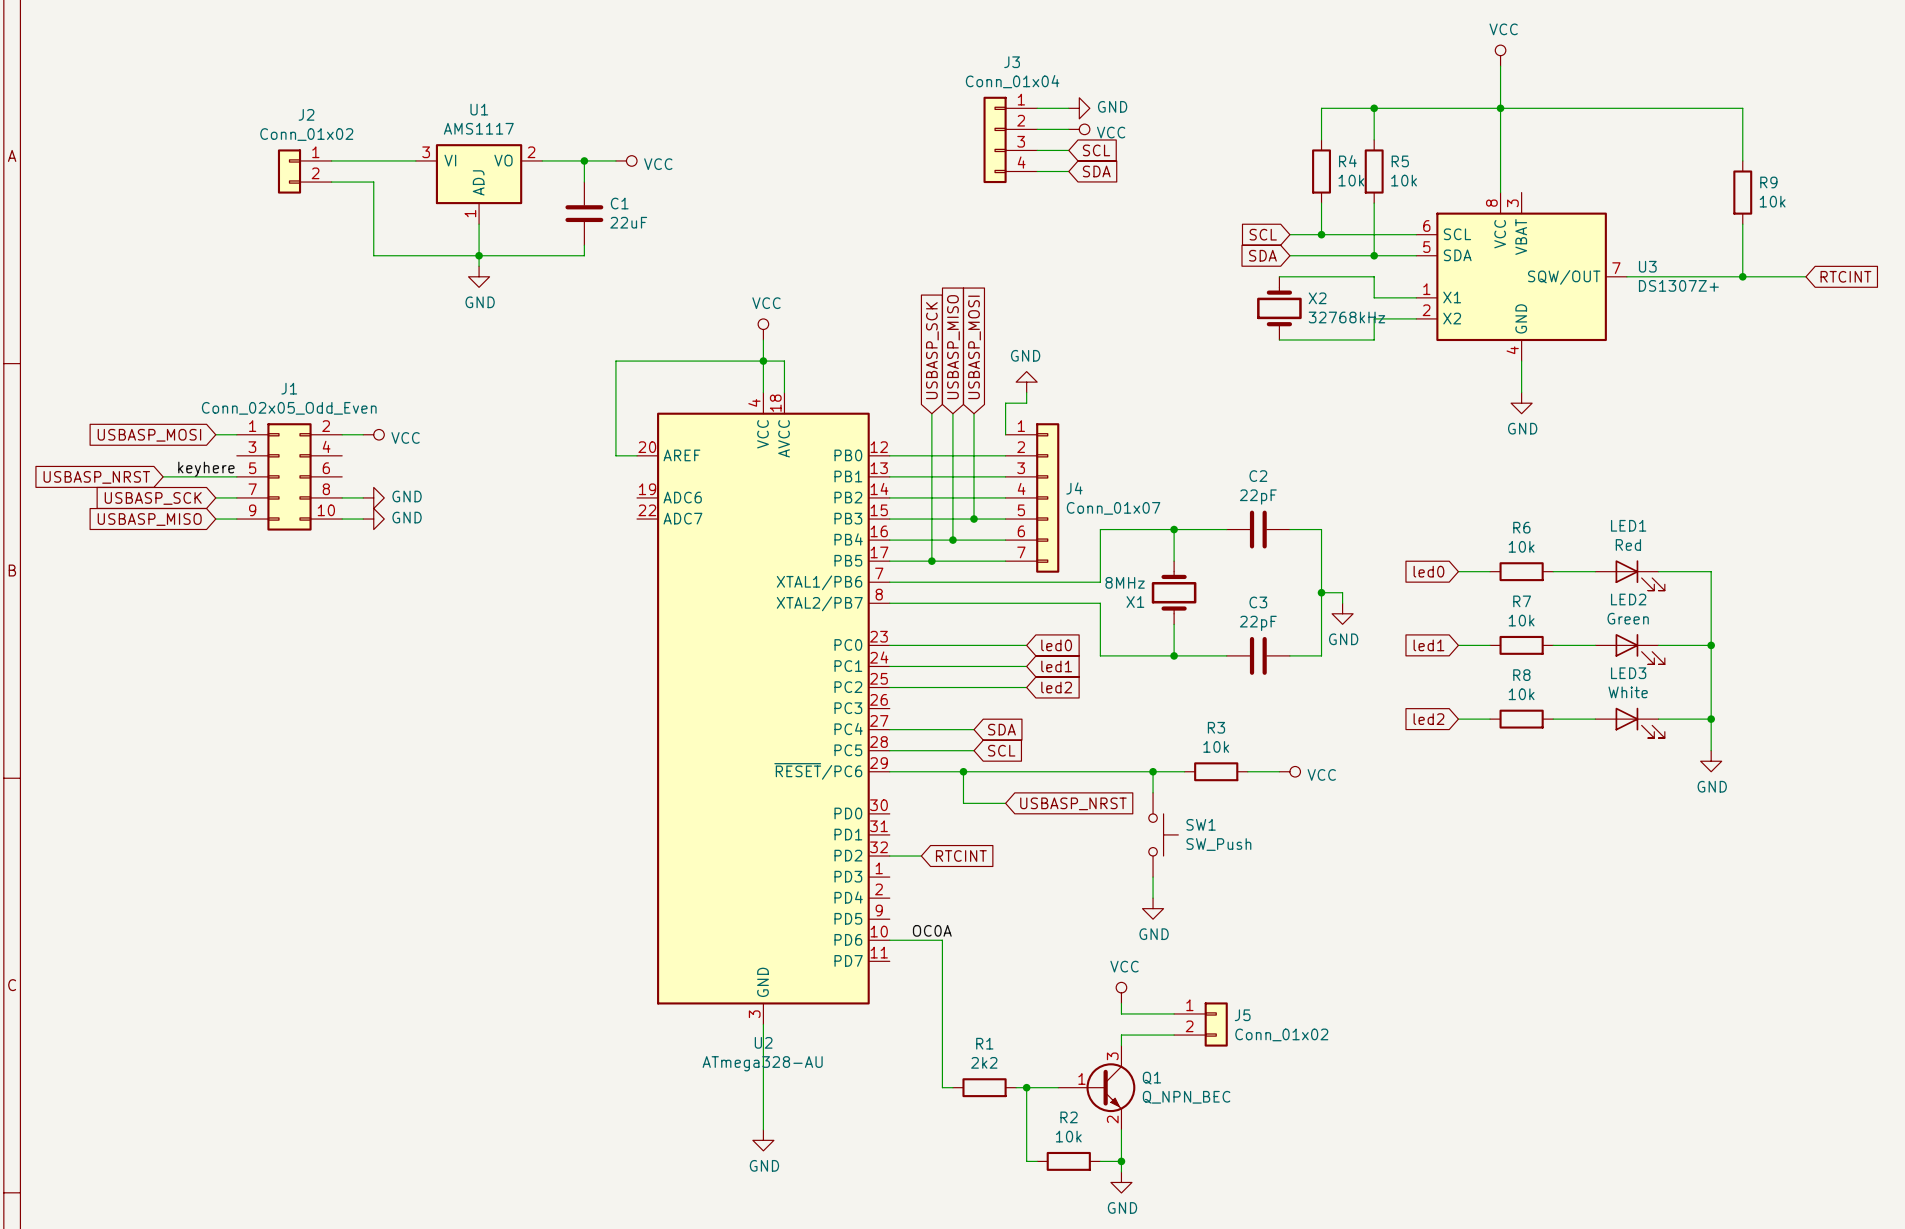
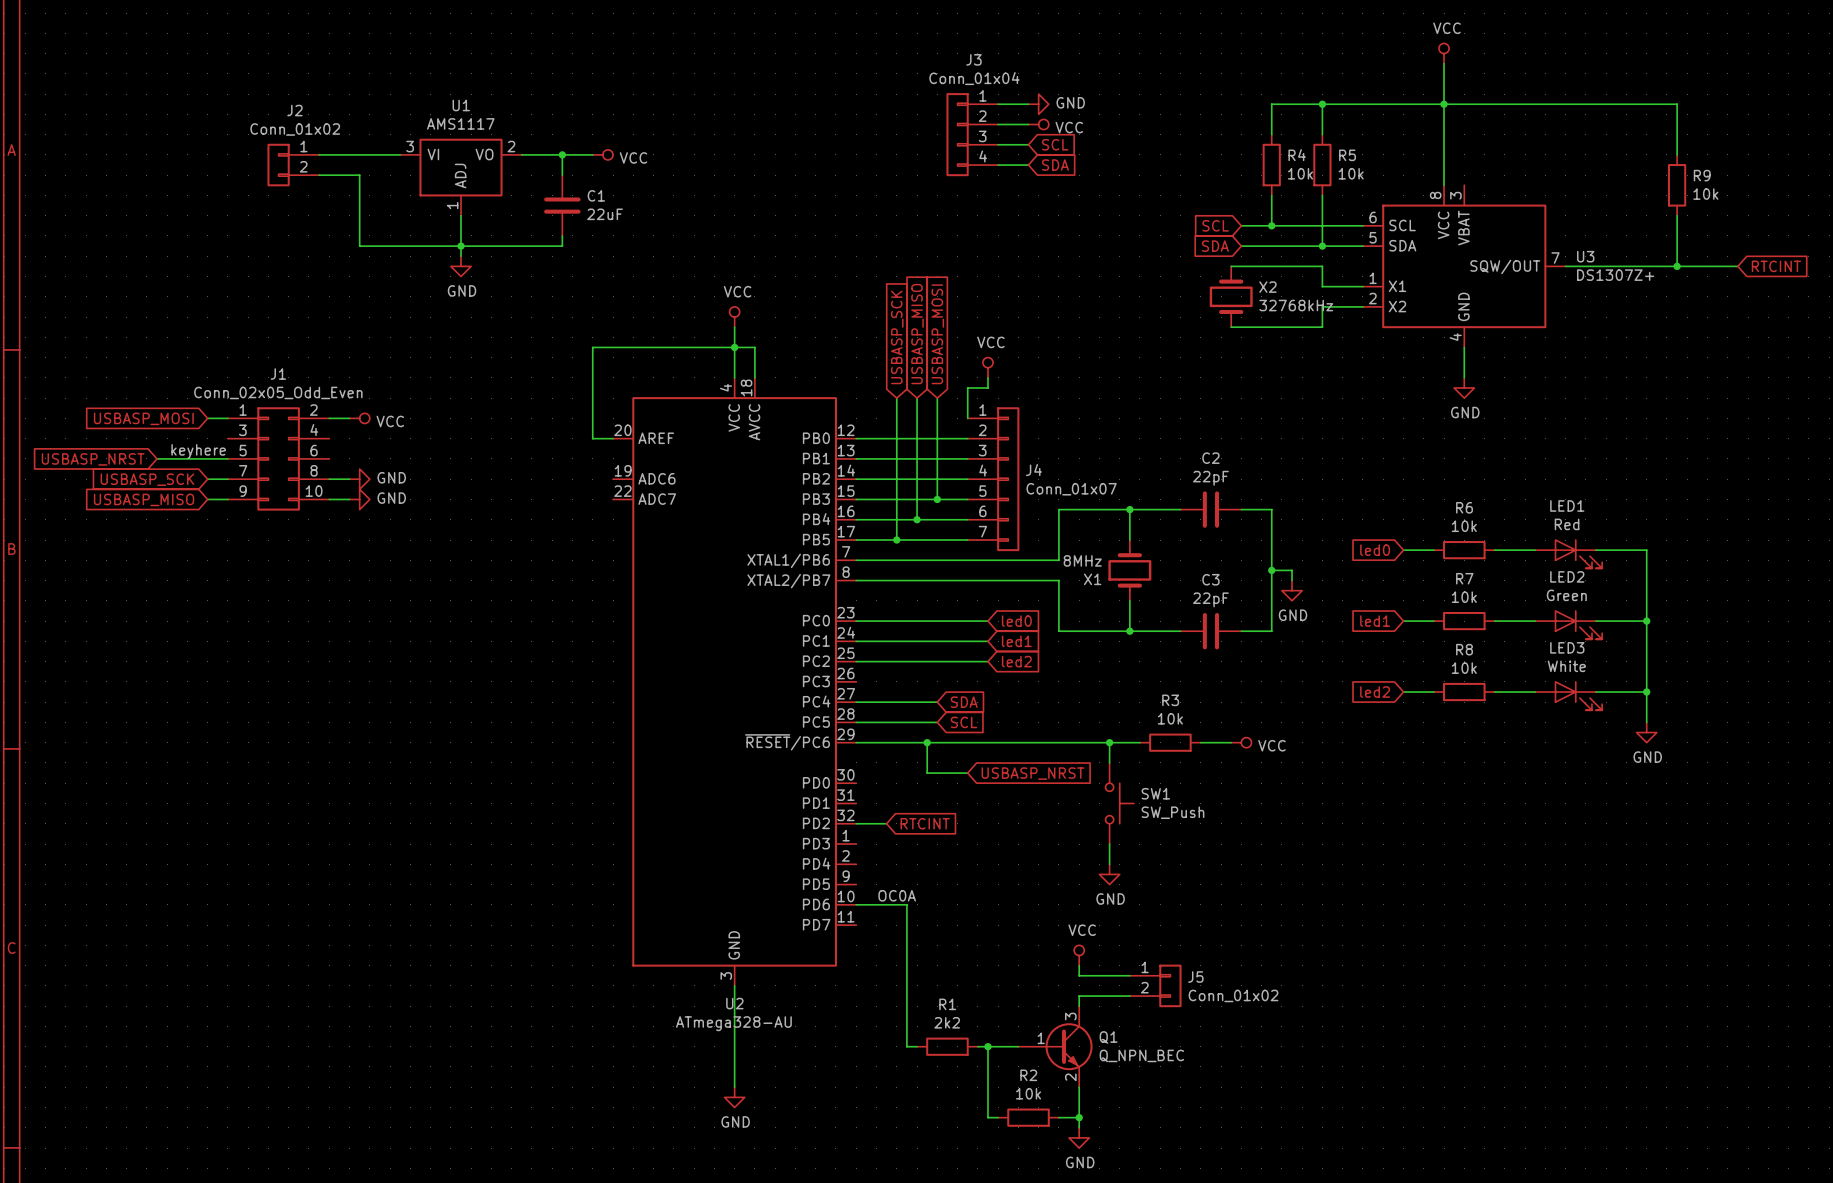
power symbol: GND (1026, 382) -> VCC (987, 367)

